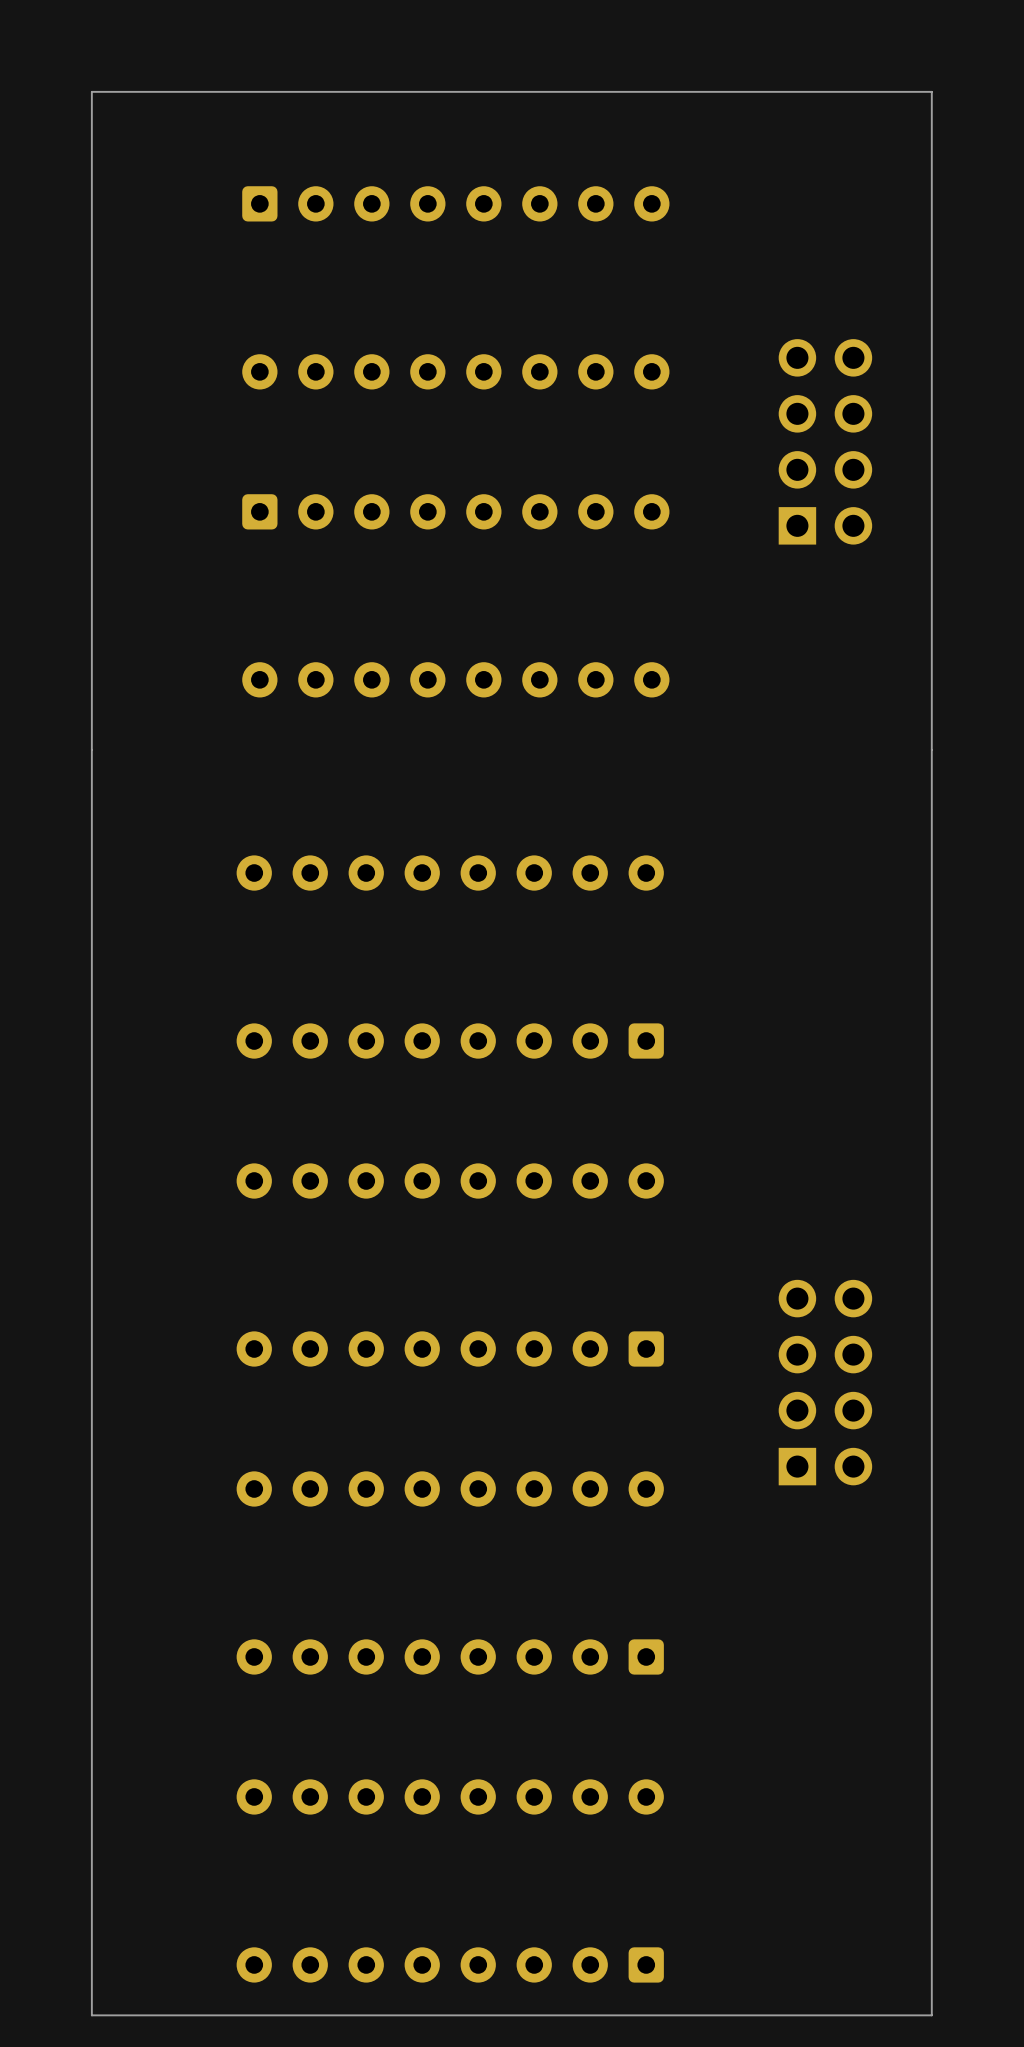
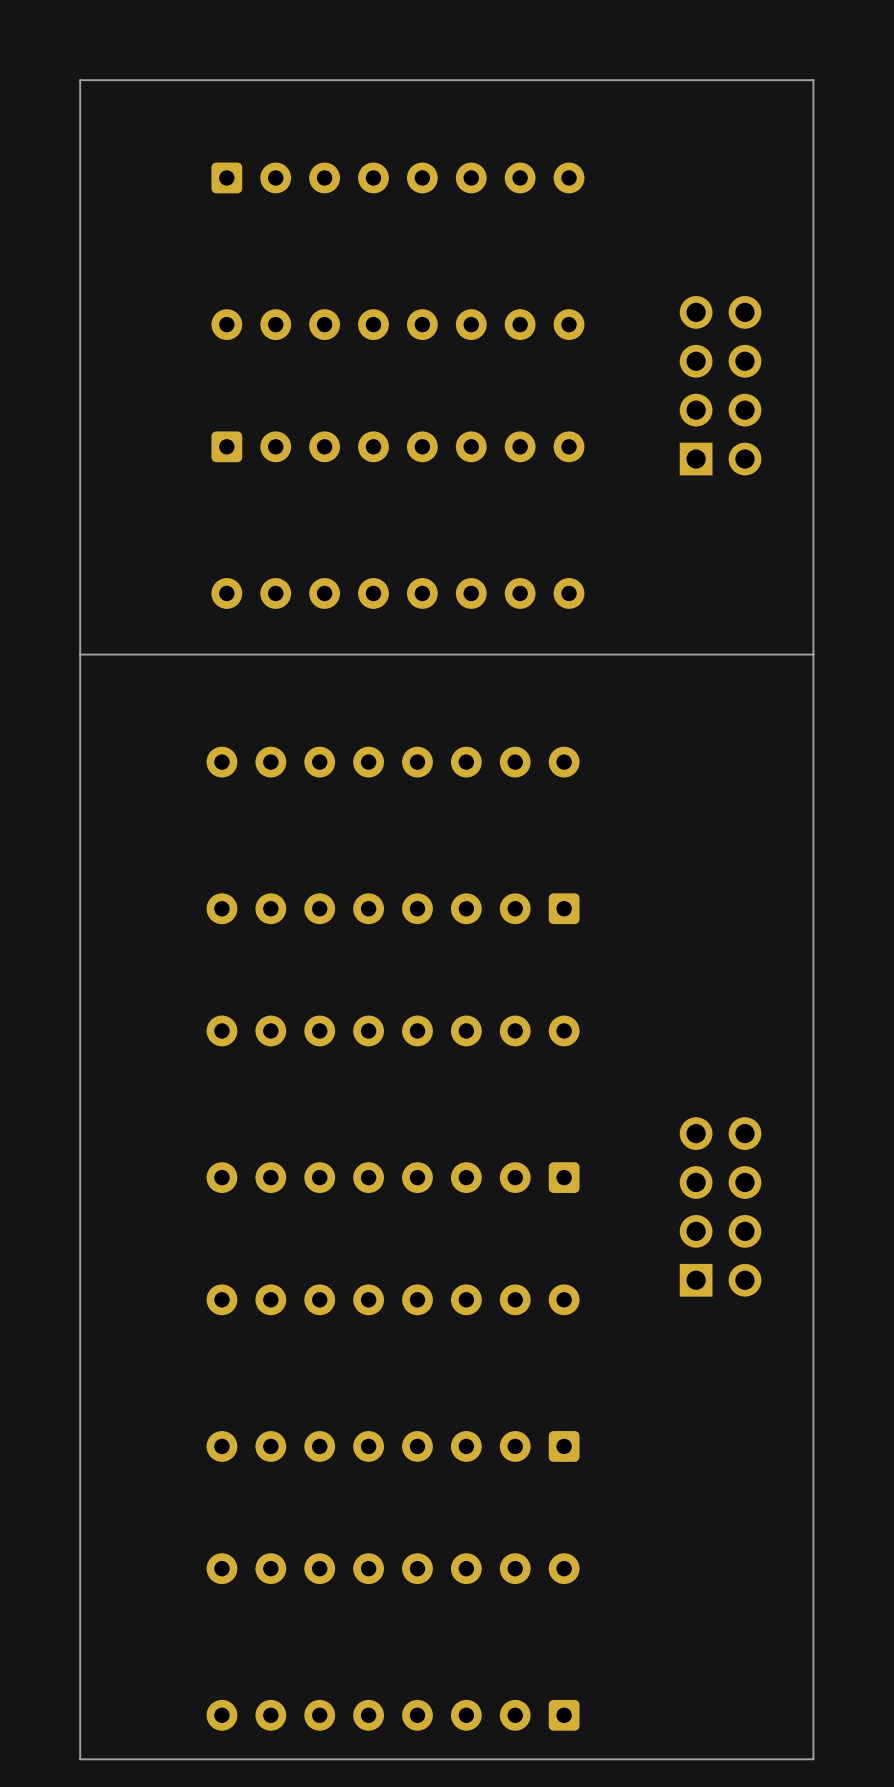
board edge: none -> (813, 654) (80, 654)

